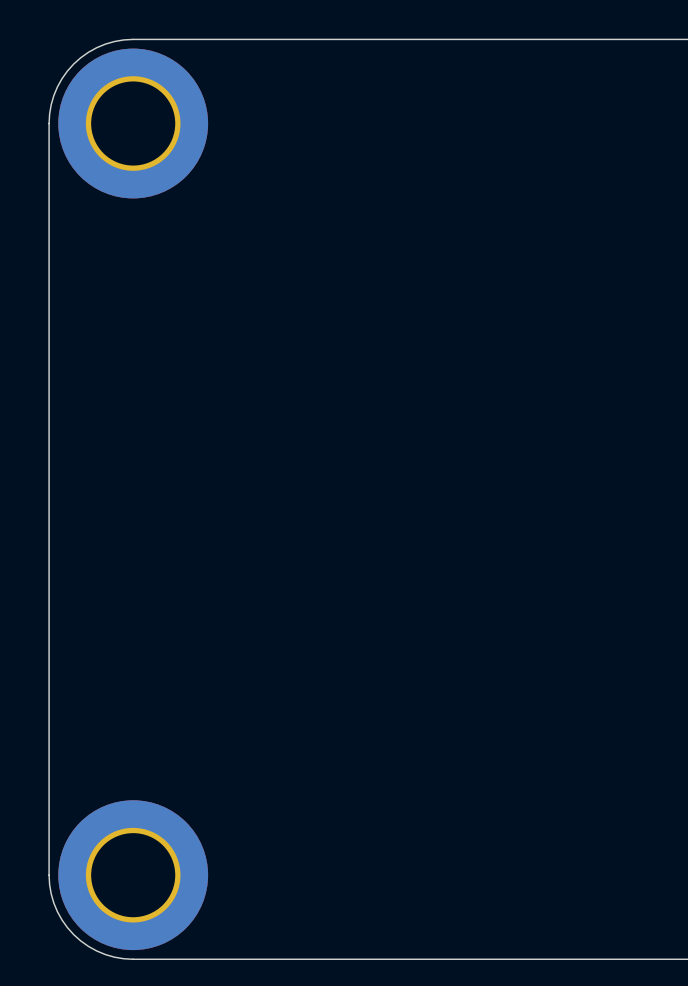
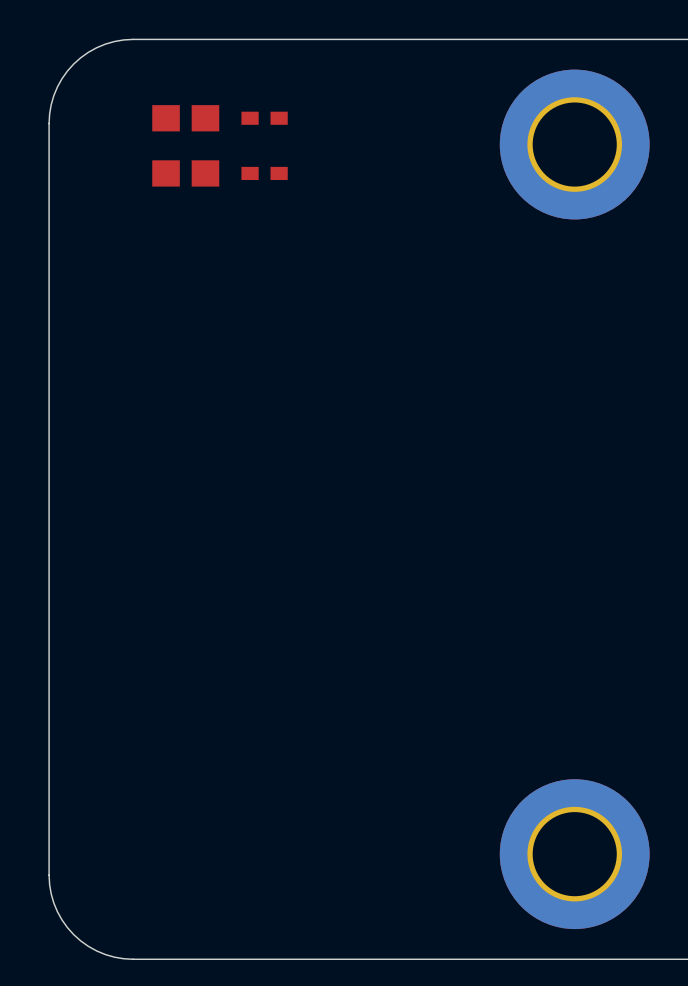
part: none -> (185, 118)
part: none -> (264, 118)
part: (133, 123) -> none
part: none -> (574, 144)
part: none -> (185, 173)
part: none -> (264, 173)
part: none -> (574, 854)
part: (133, 875) -> none

